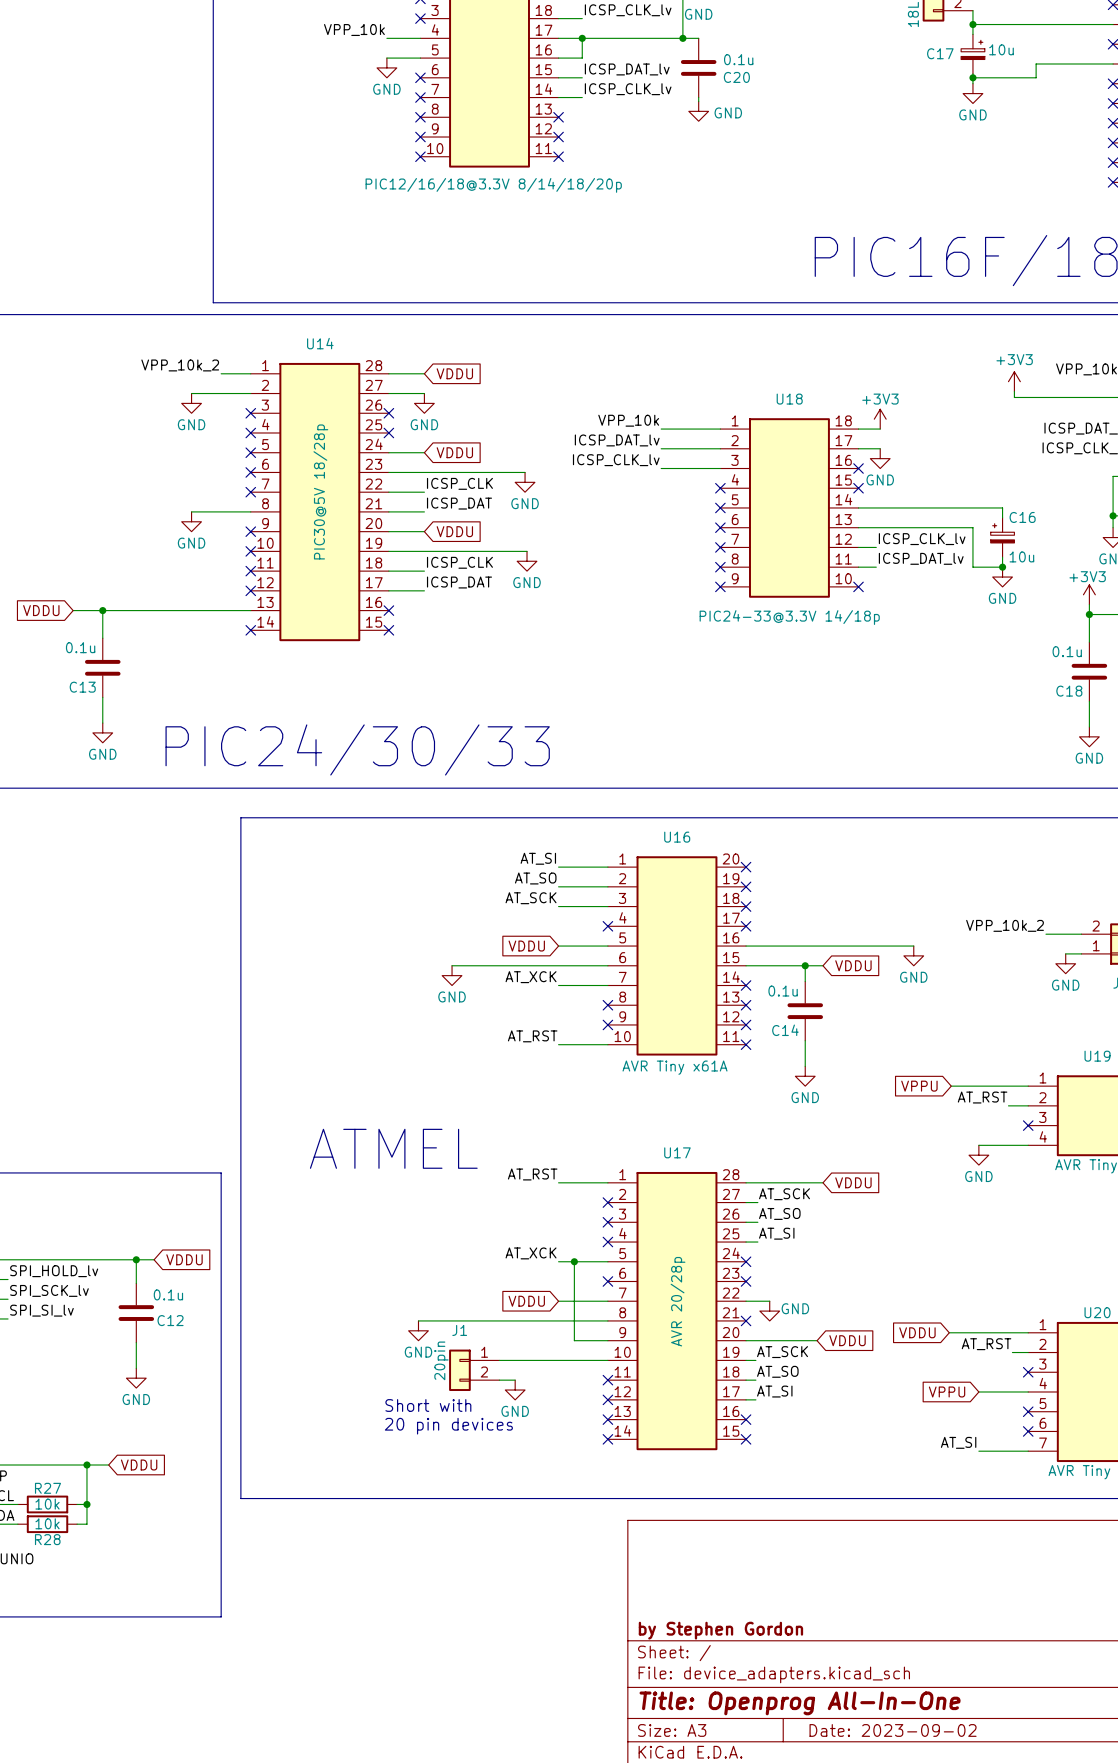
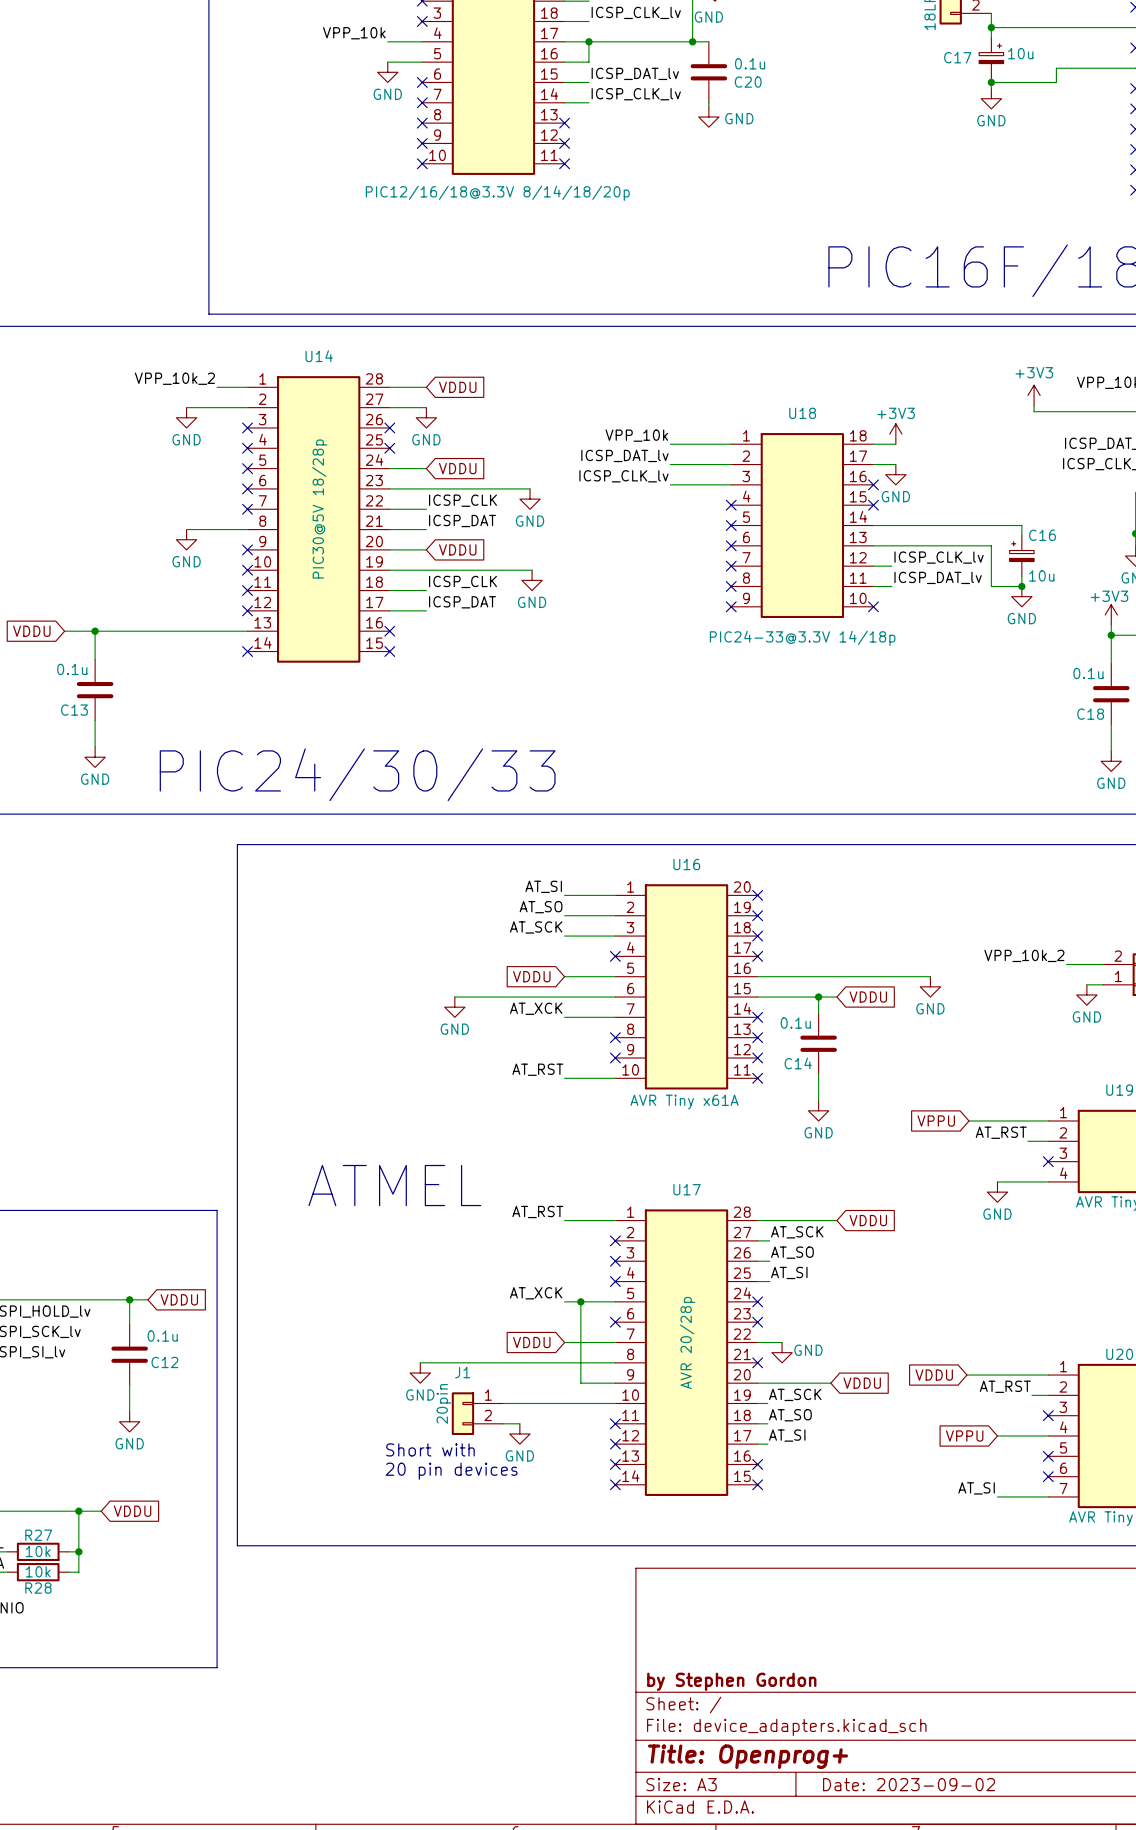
title block: Title: Openprog All-In-One (800, 1703) -> Title: Openprog+ (748, 1756)

